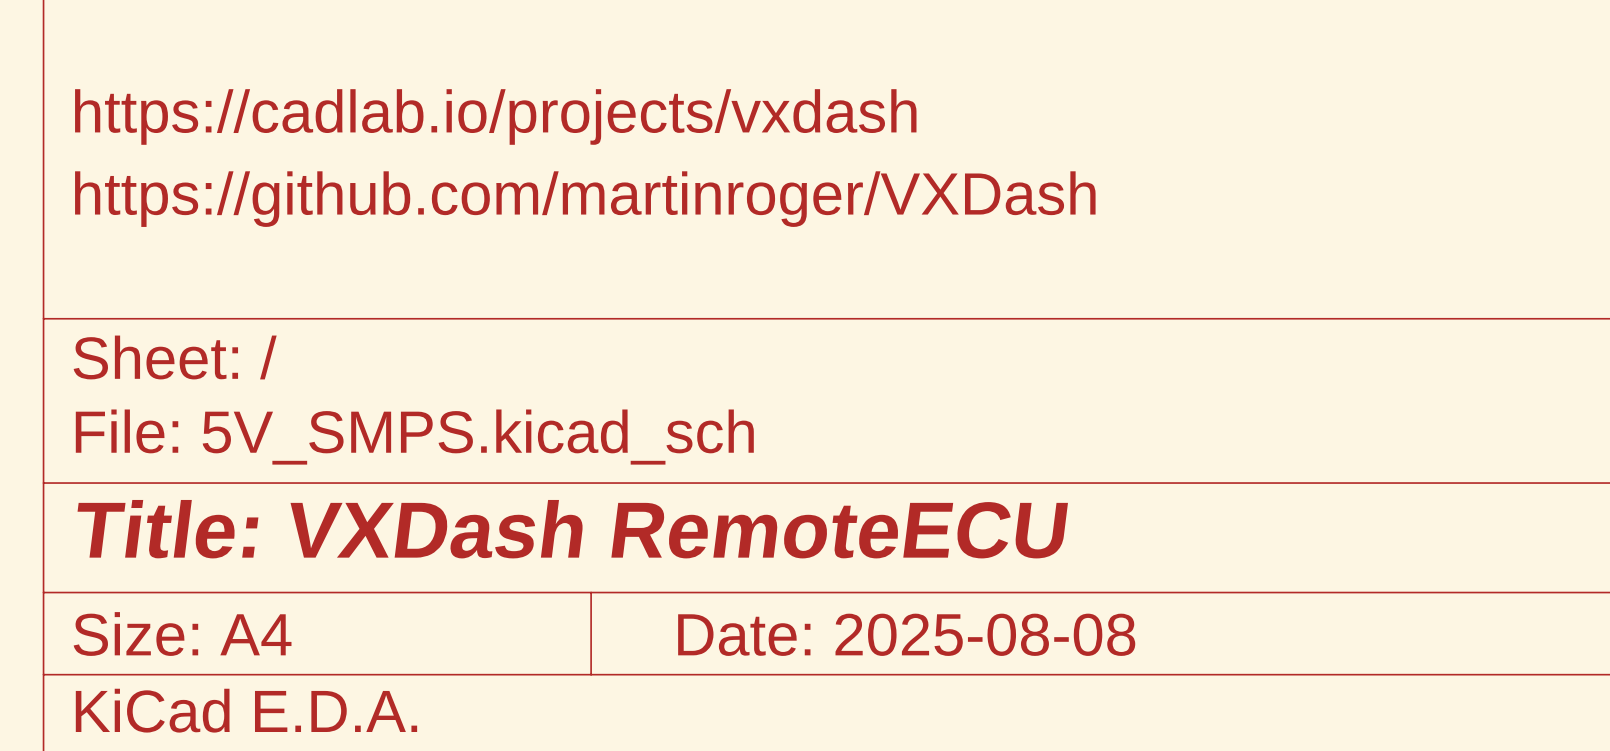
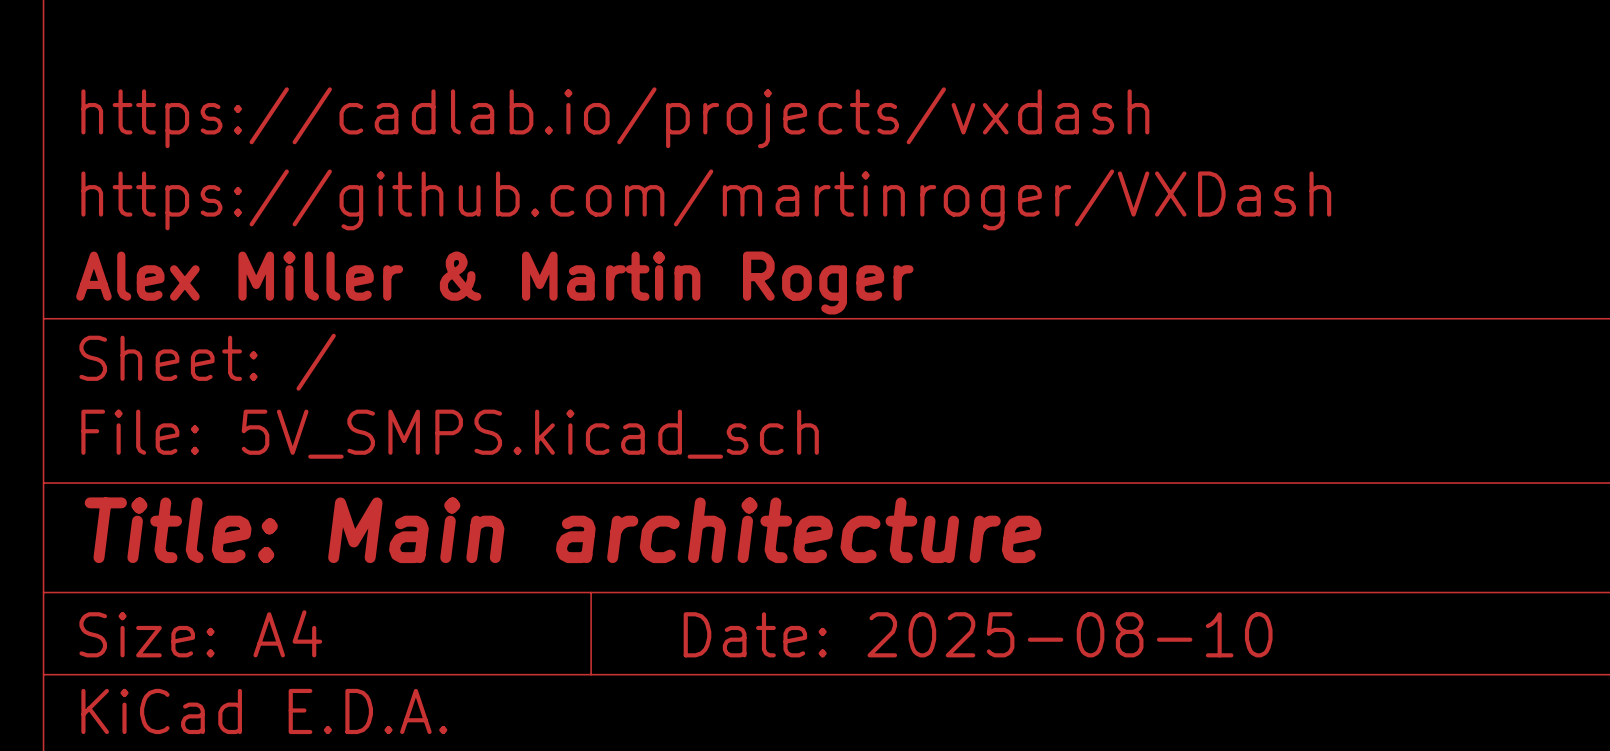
title block: none -> Alex Miller & Martin Roger (494, 283)
title block: Title: VXDash RemoteECU (572, 529) -> Title: Main architecture (563, 530)
title block: Date: 2025-08-08 (906, 634) -> Date: 2025-08-10 (978, 634)

